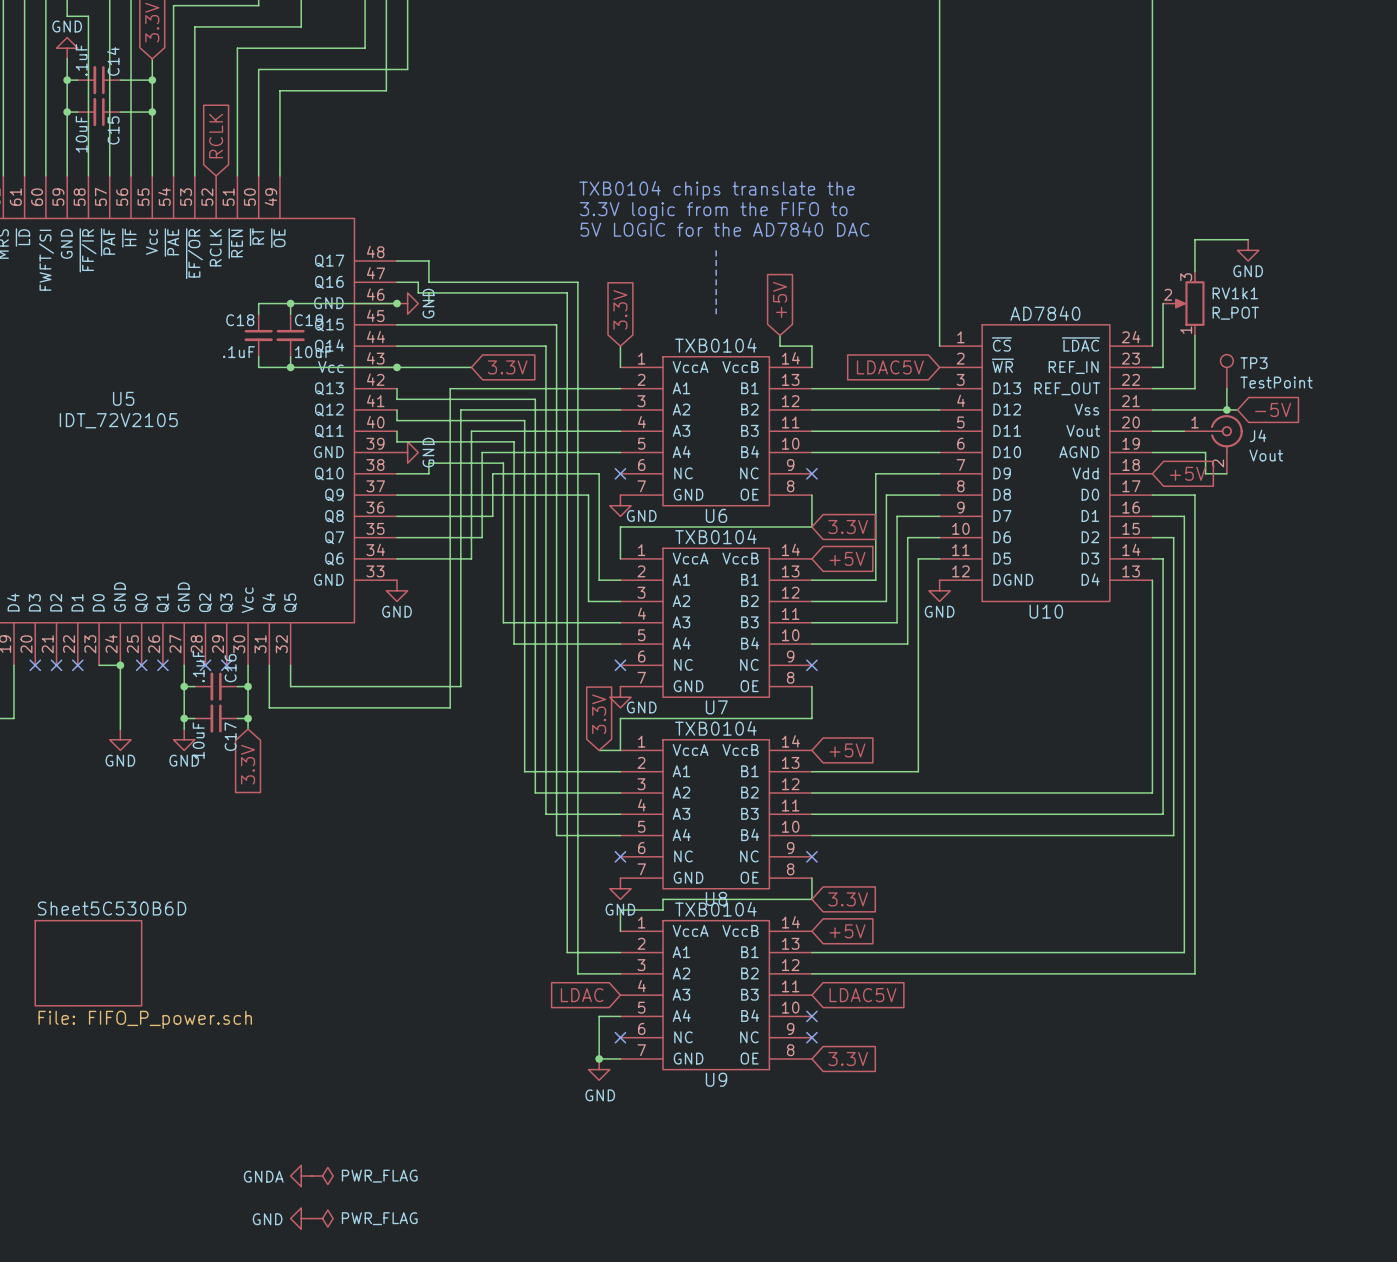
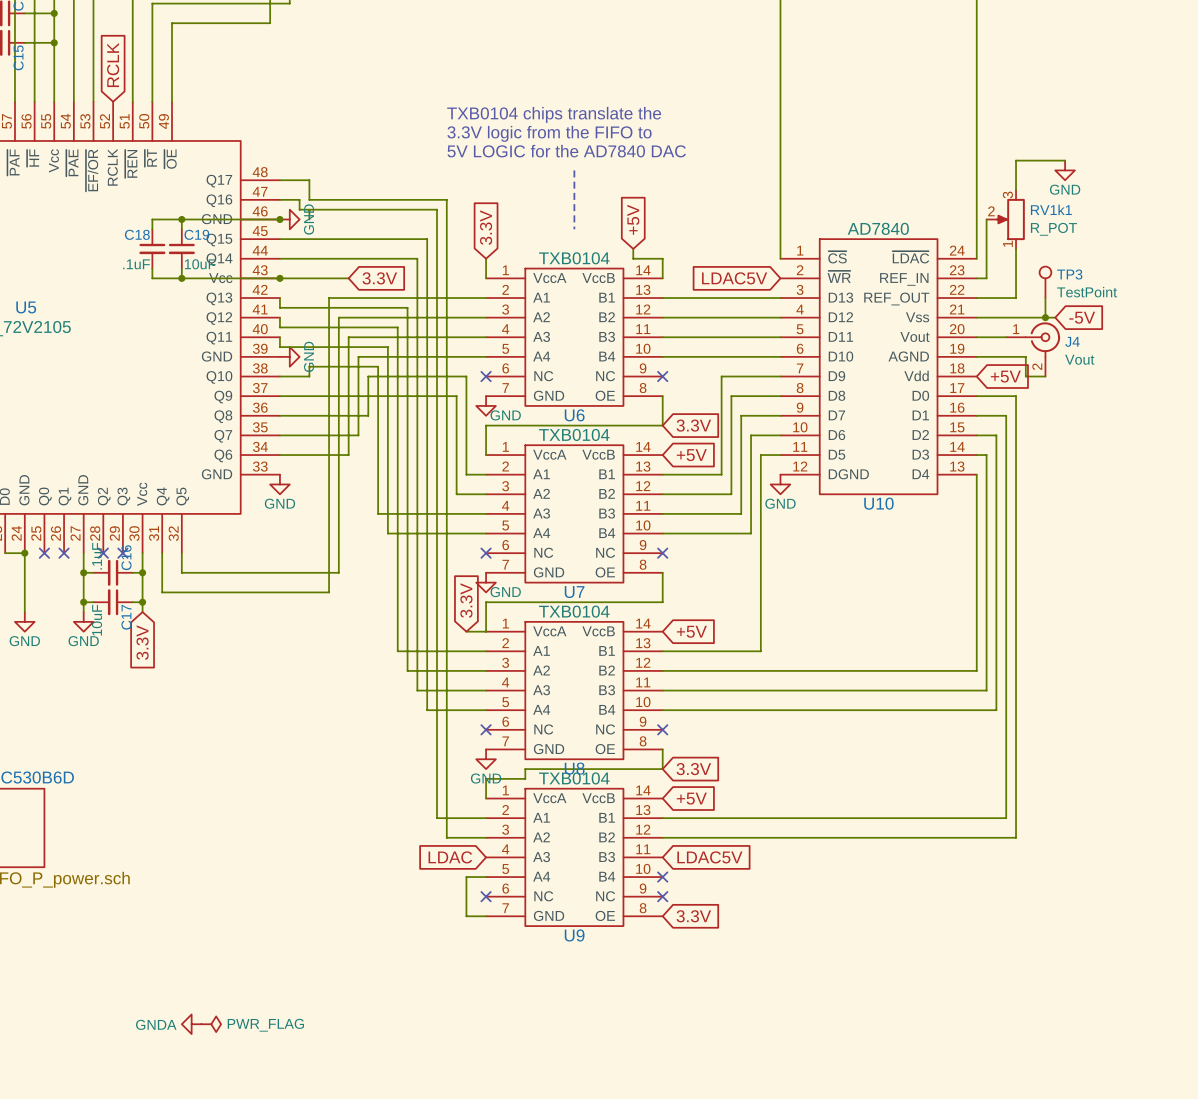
junction: (599, 1058) -> none
power symbol: GND (599, 1069) -> none
power symbol: GND (301, 1218) -> none
power symbol: PWR_FLAG (322, 1218) -> none

